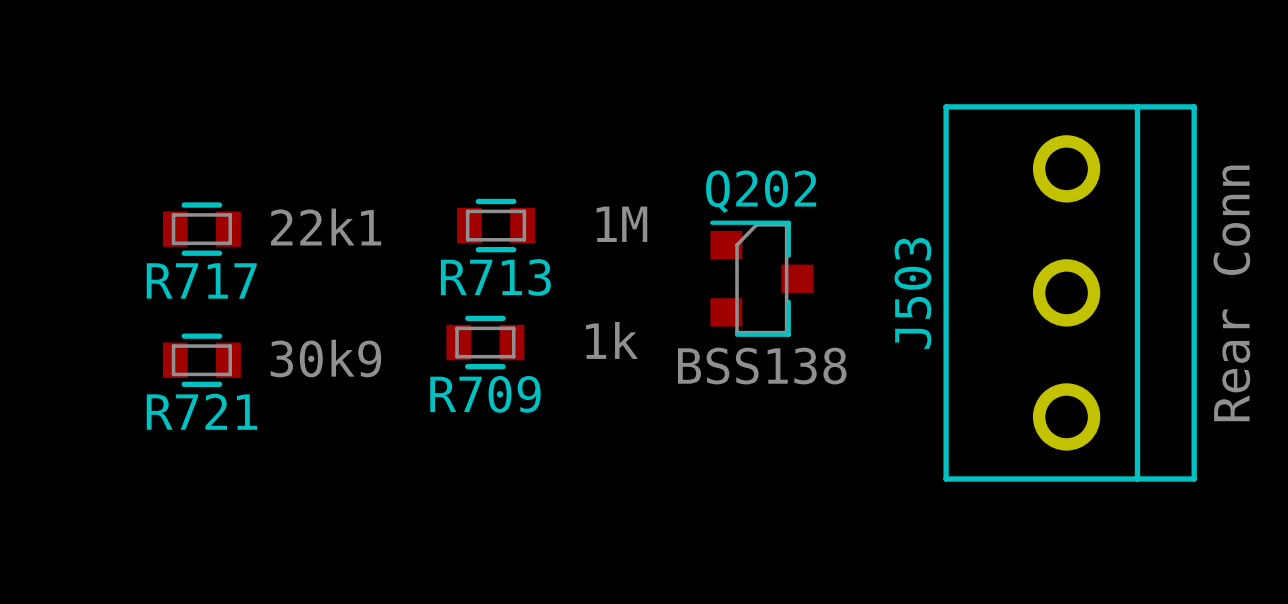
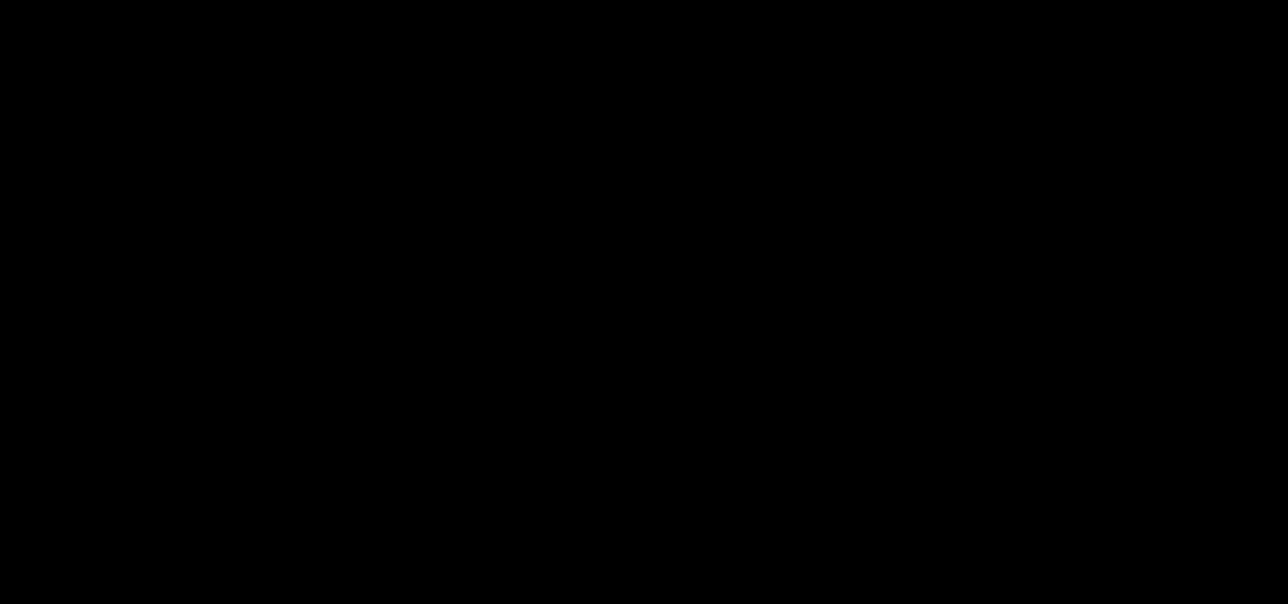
R713: 1M (496, 225) -> none
R717: 22k1 (201, 229) -> none
Q202: BSS138 (761, 278) -> none
J503: Rear Conn (1070, 292) -> none
R709: 1k (485, 342) -> none
R721: 30k9 (201, 360) -> none

